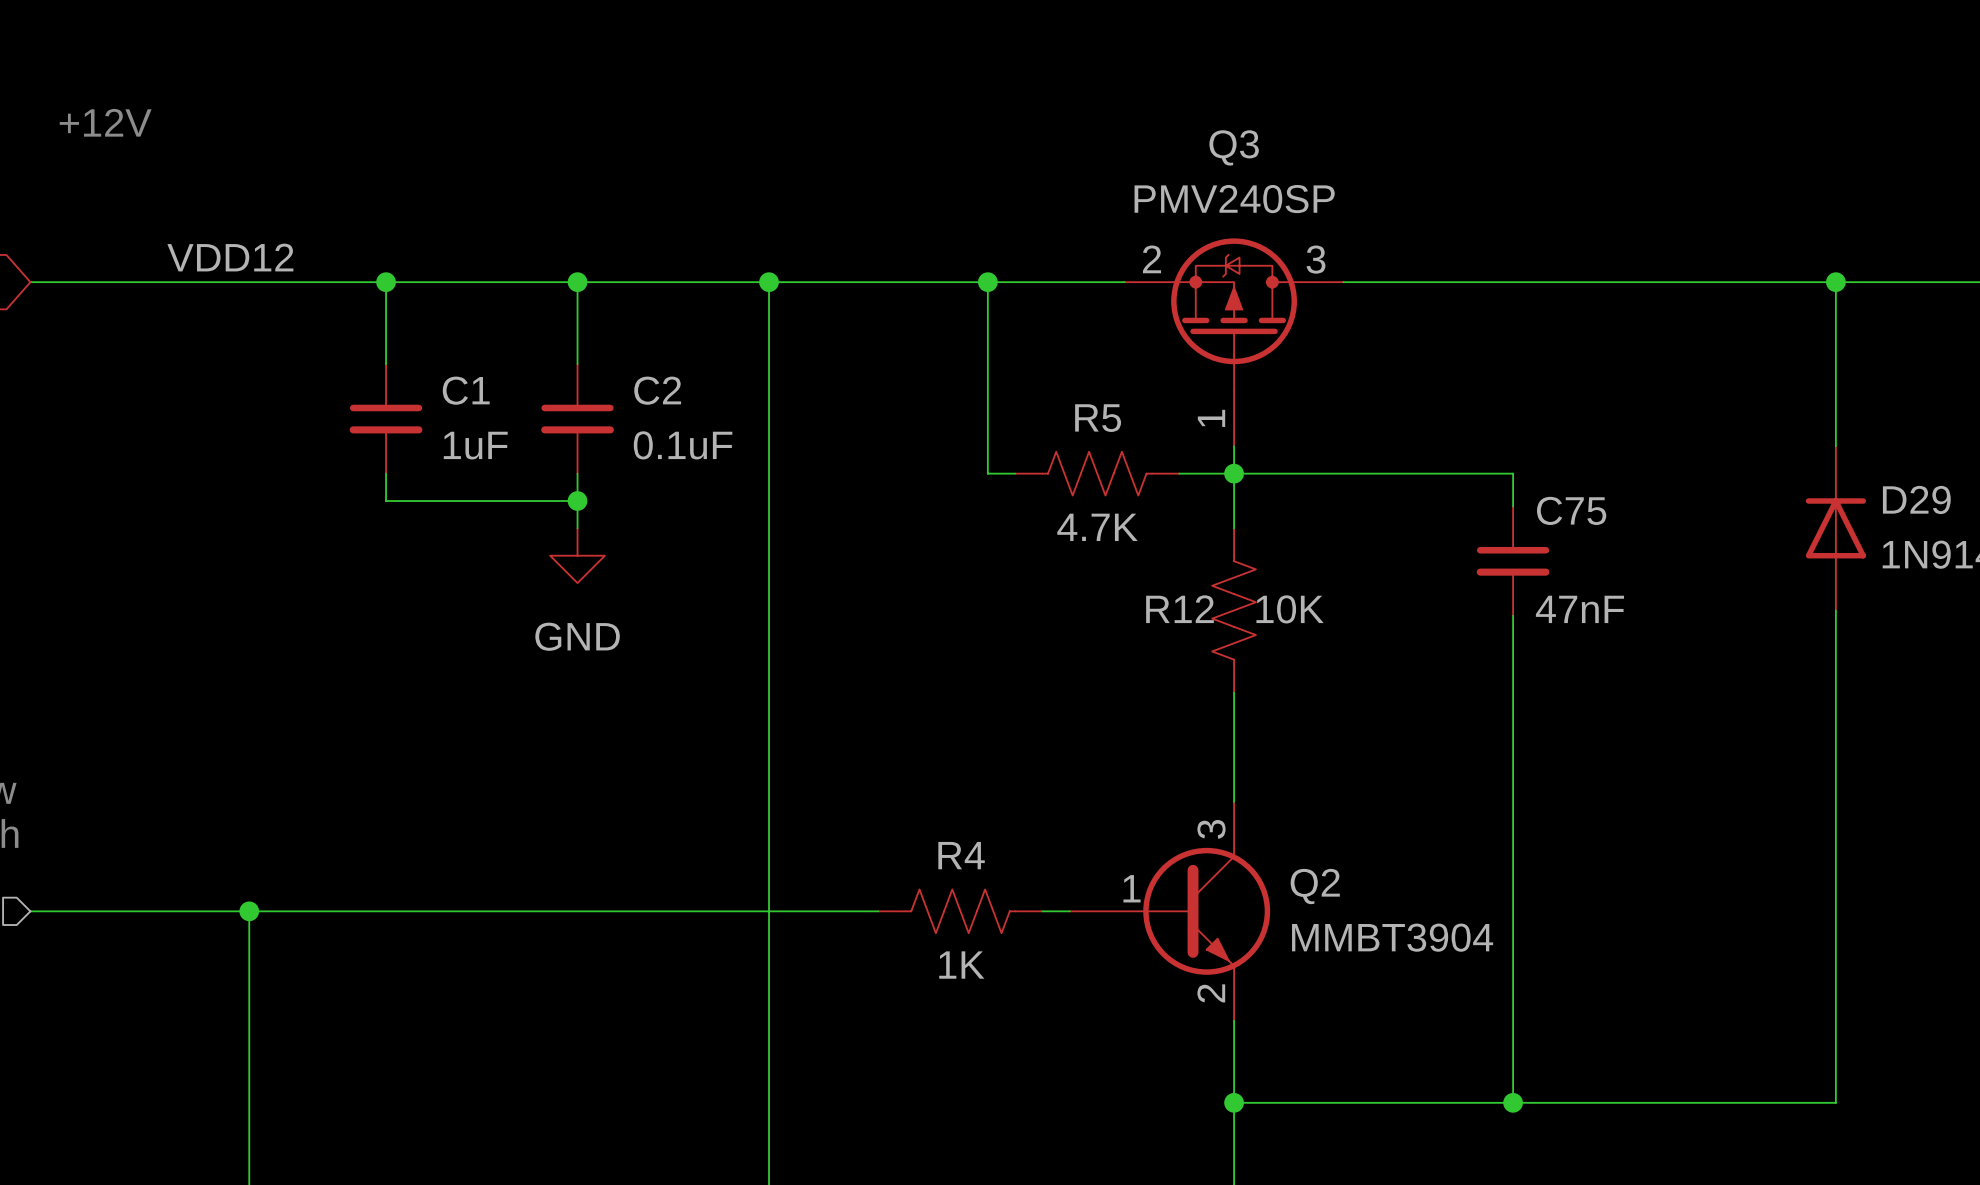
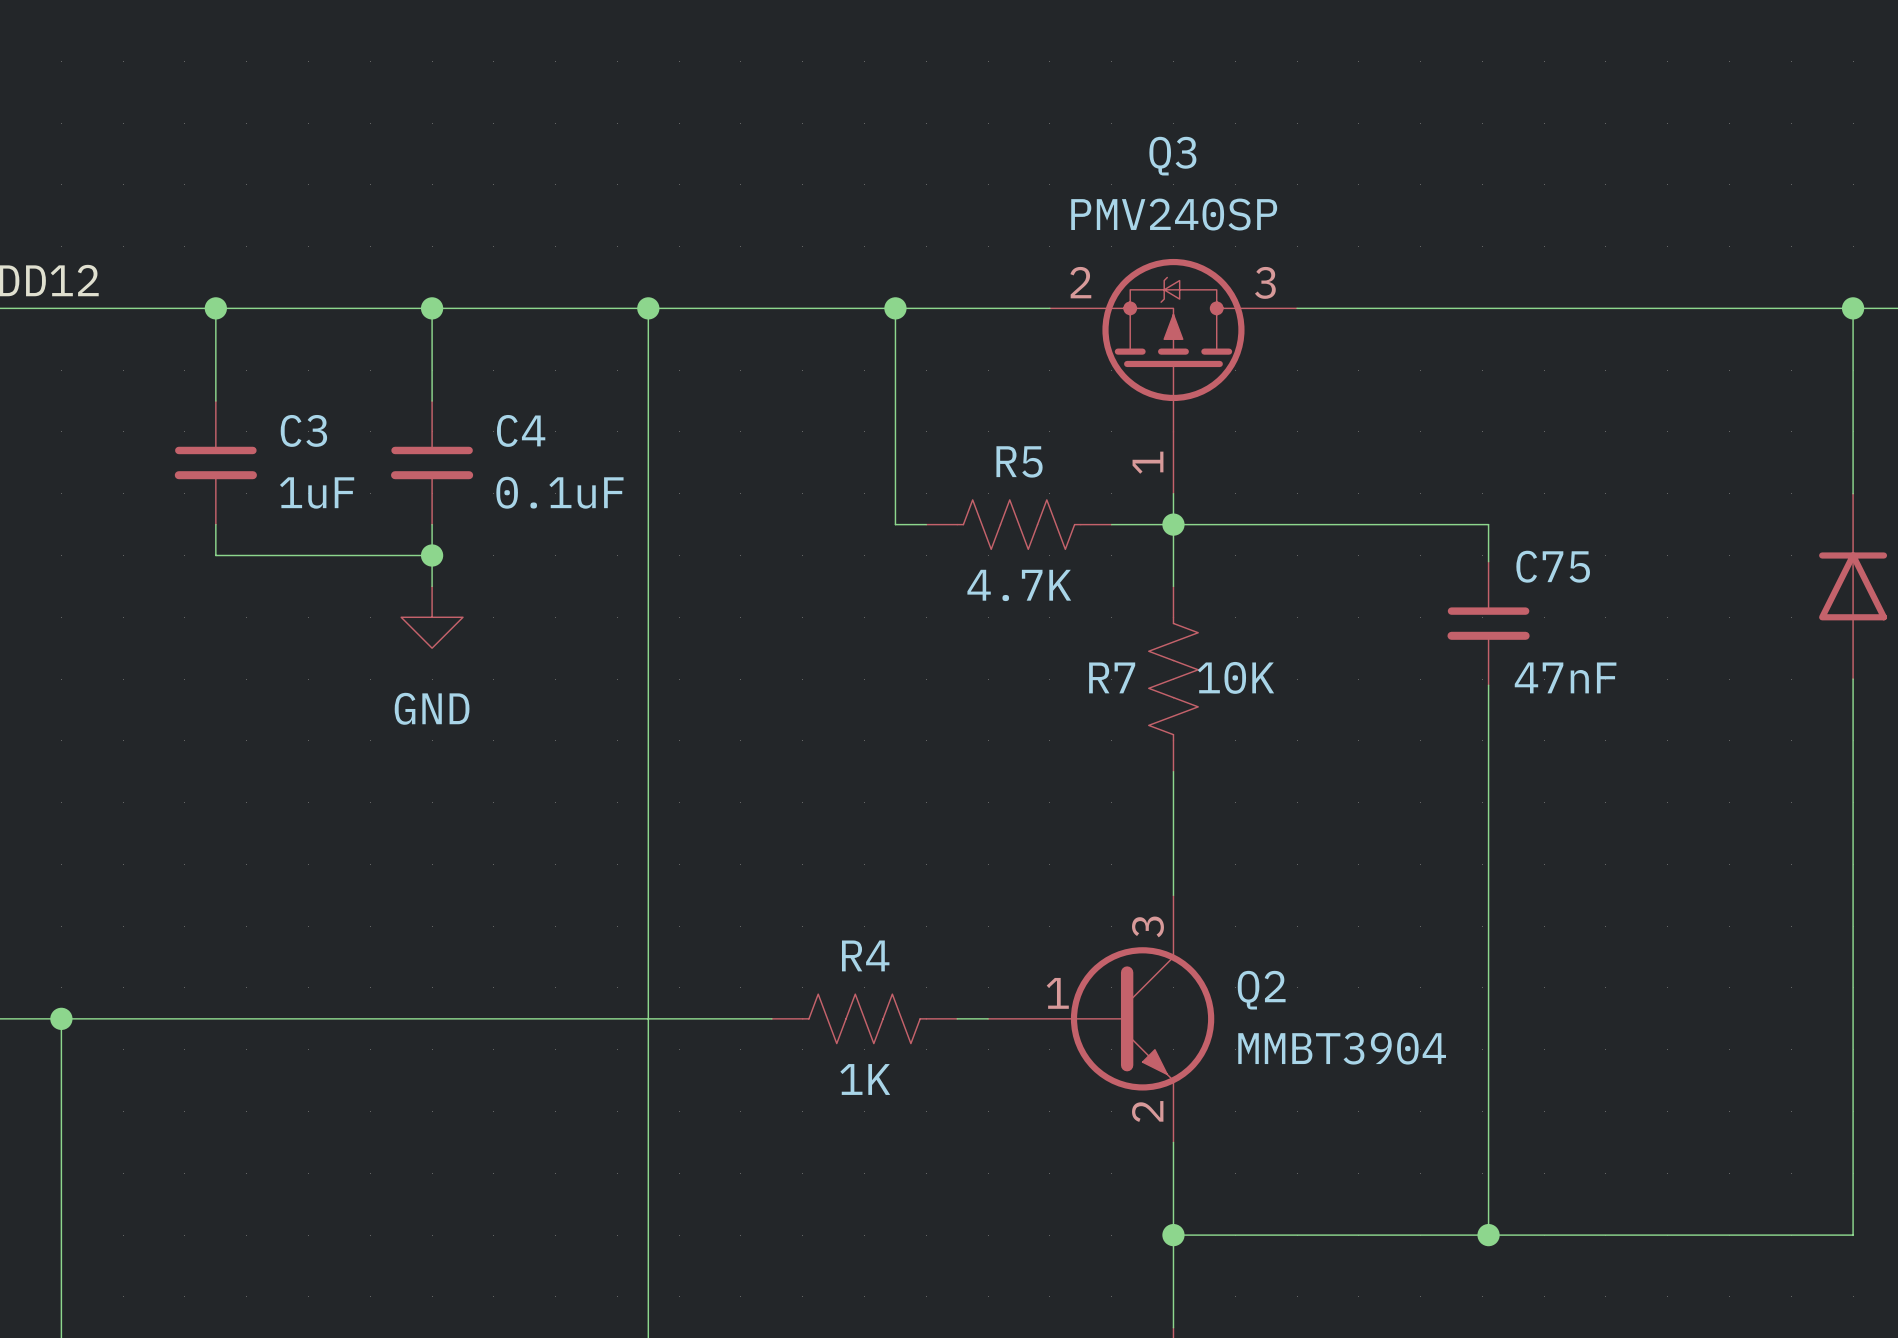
C1 name: C1 (466, 390) -> C3 (303, 430)
C2 name: C2 (657, 390) -> C4 (521, 430)
R12 name: R12 (1179, 609) -> R7 (1112, 677)

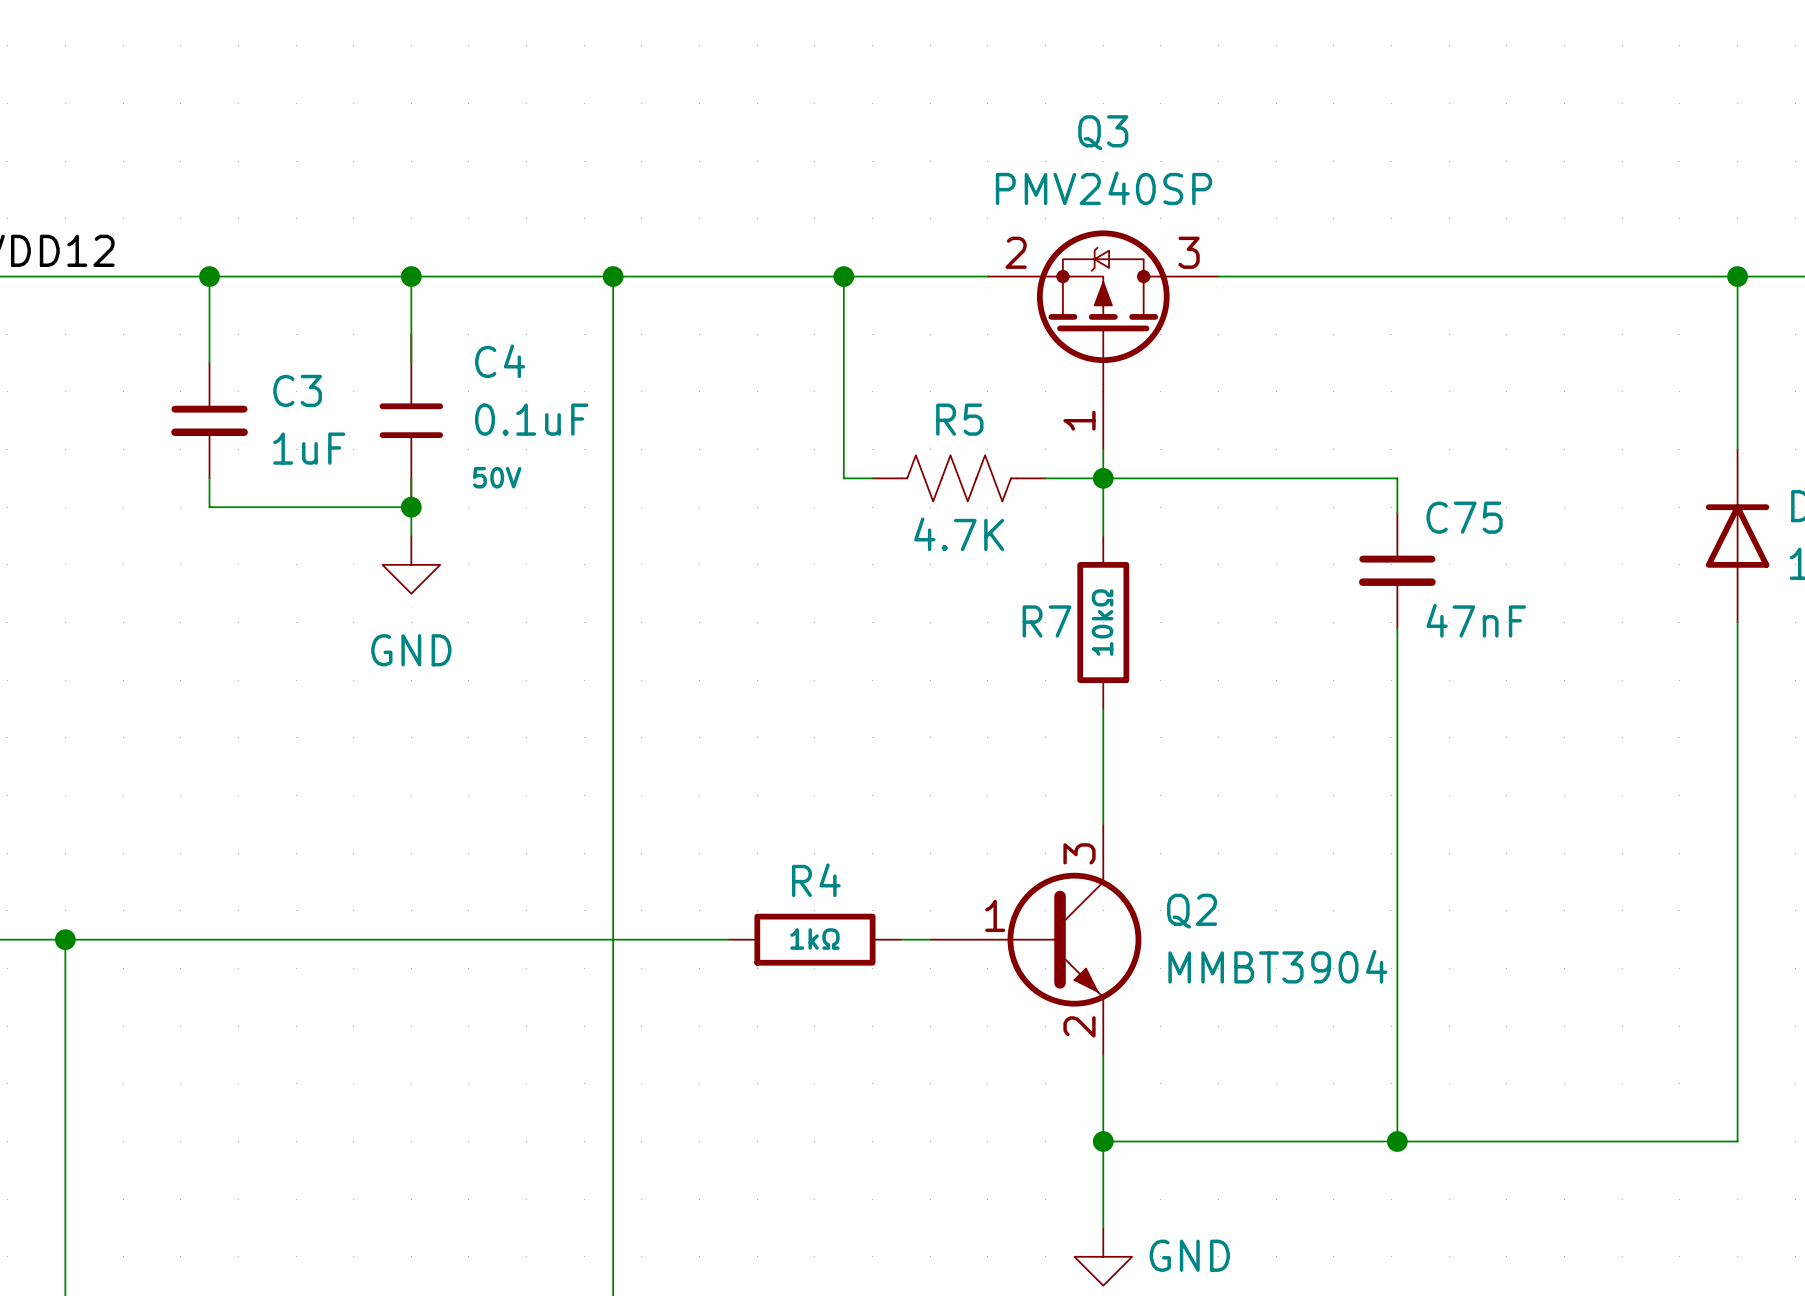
C4 symbol: [391, 401, 474, 525] -> [379, 334, 444, 508]
C4 text: none -> 50V (497, 477)
R7 symbol: [1148, 586, 1199, 772] -> [1077, 536, 1130, 710]
R7 value: 10K (1235, 677) -> 10kΩ (1102, 622)
R4 symbol: [771, 994, 958, 1044] -> [728, 913, 902, 966]
R4 value: 1K (865, 1079) -> 1kΩ (814, 939)

